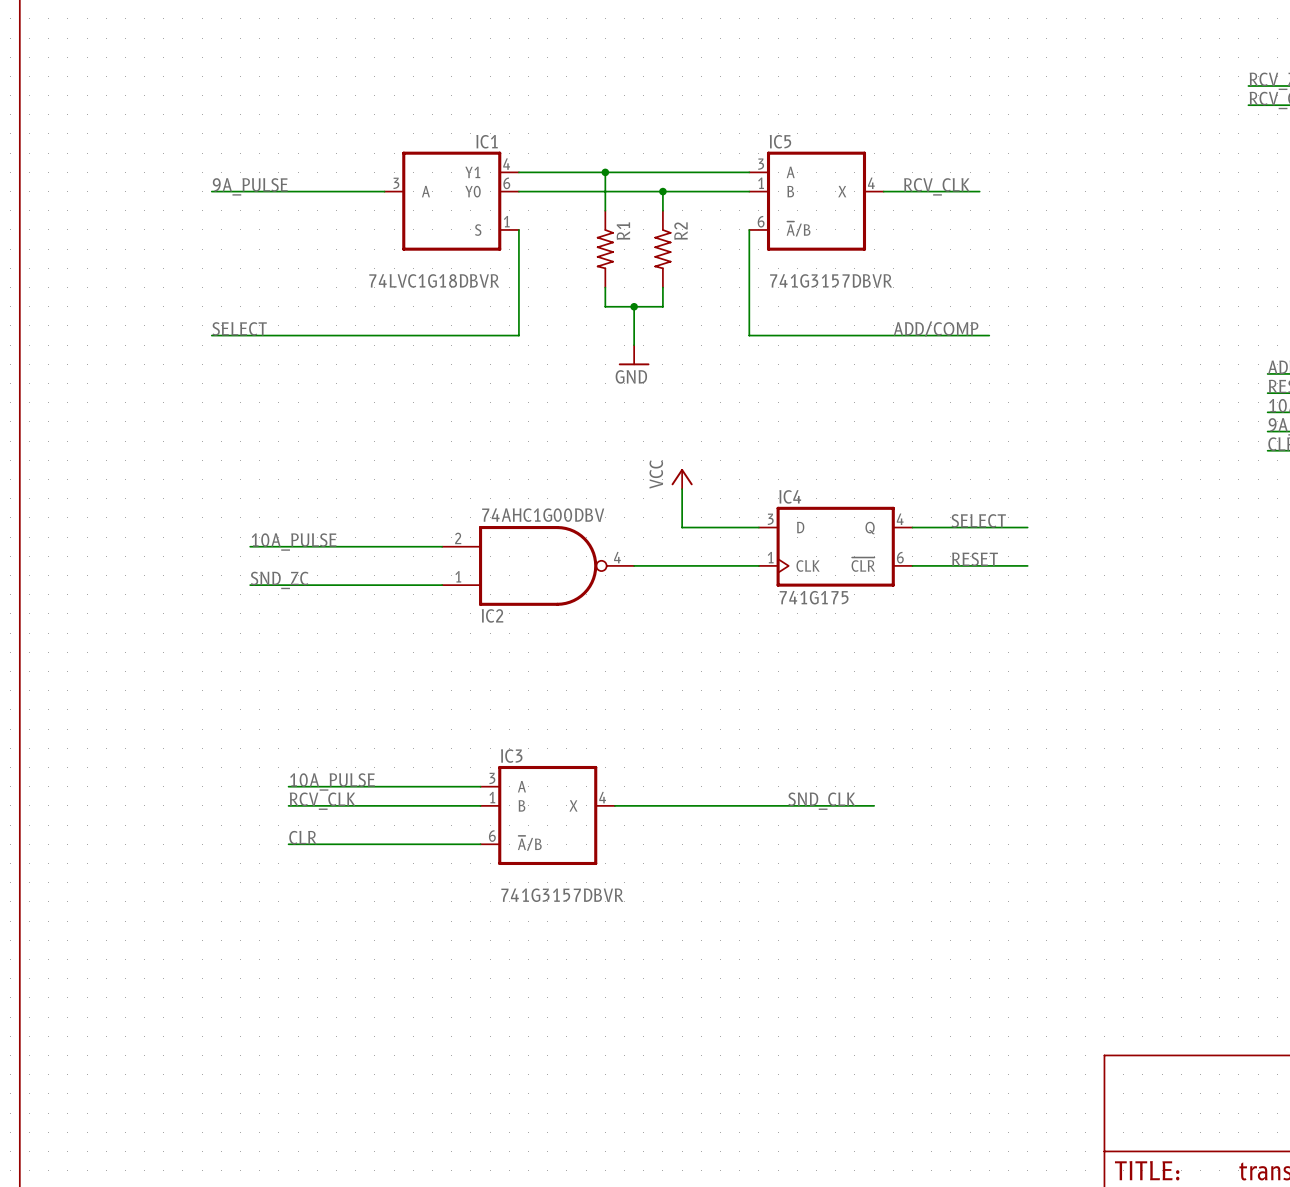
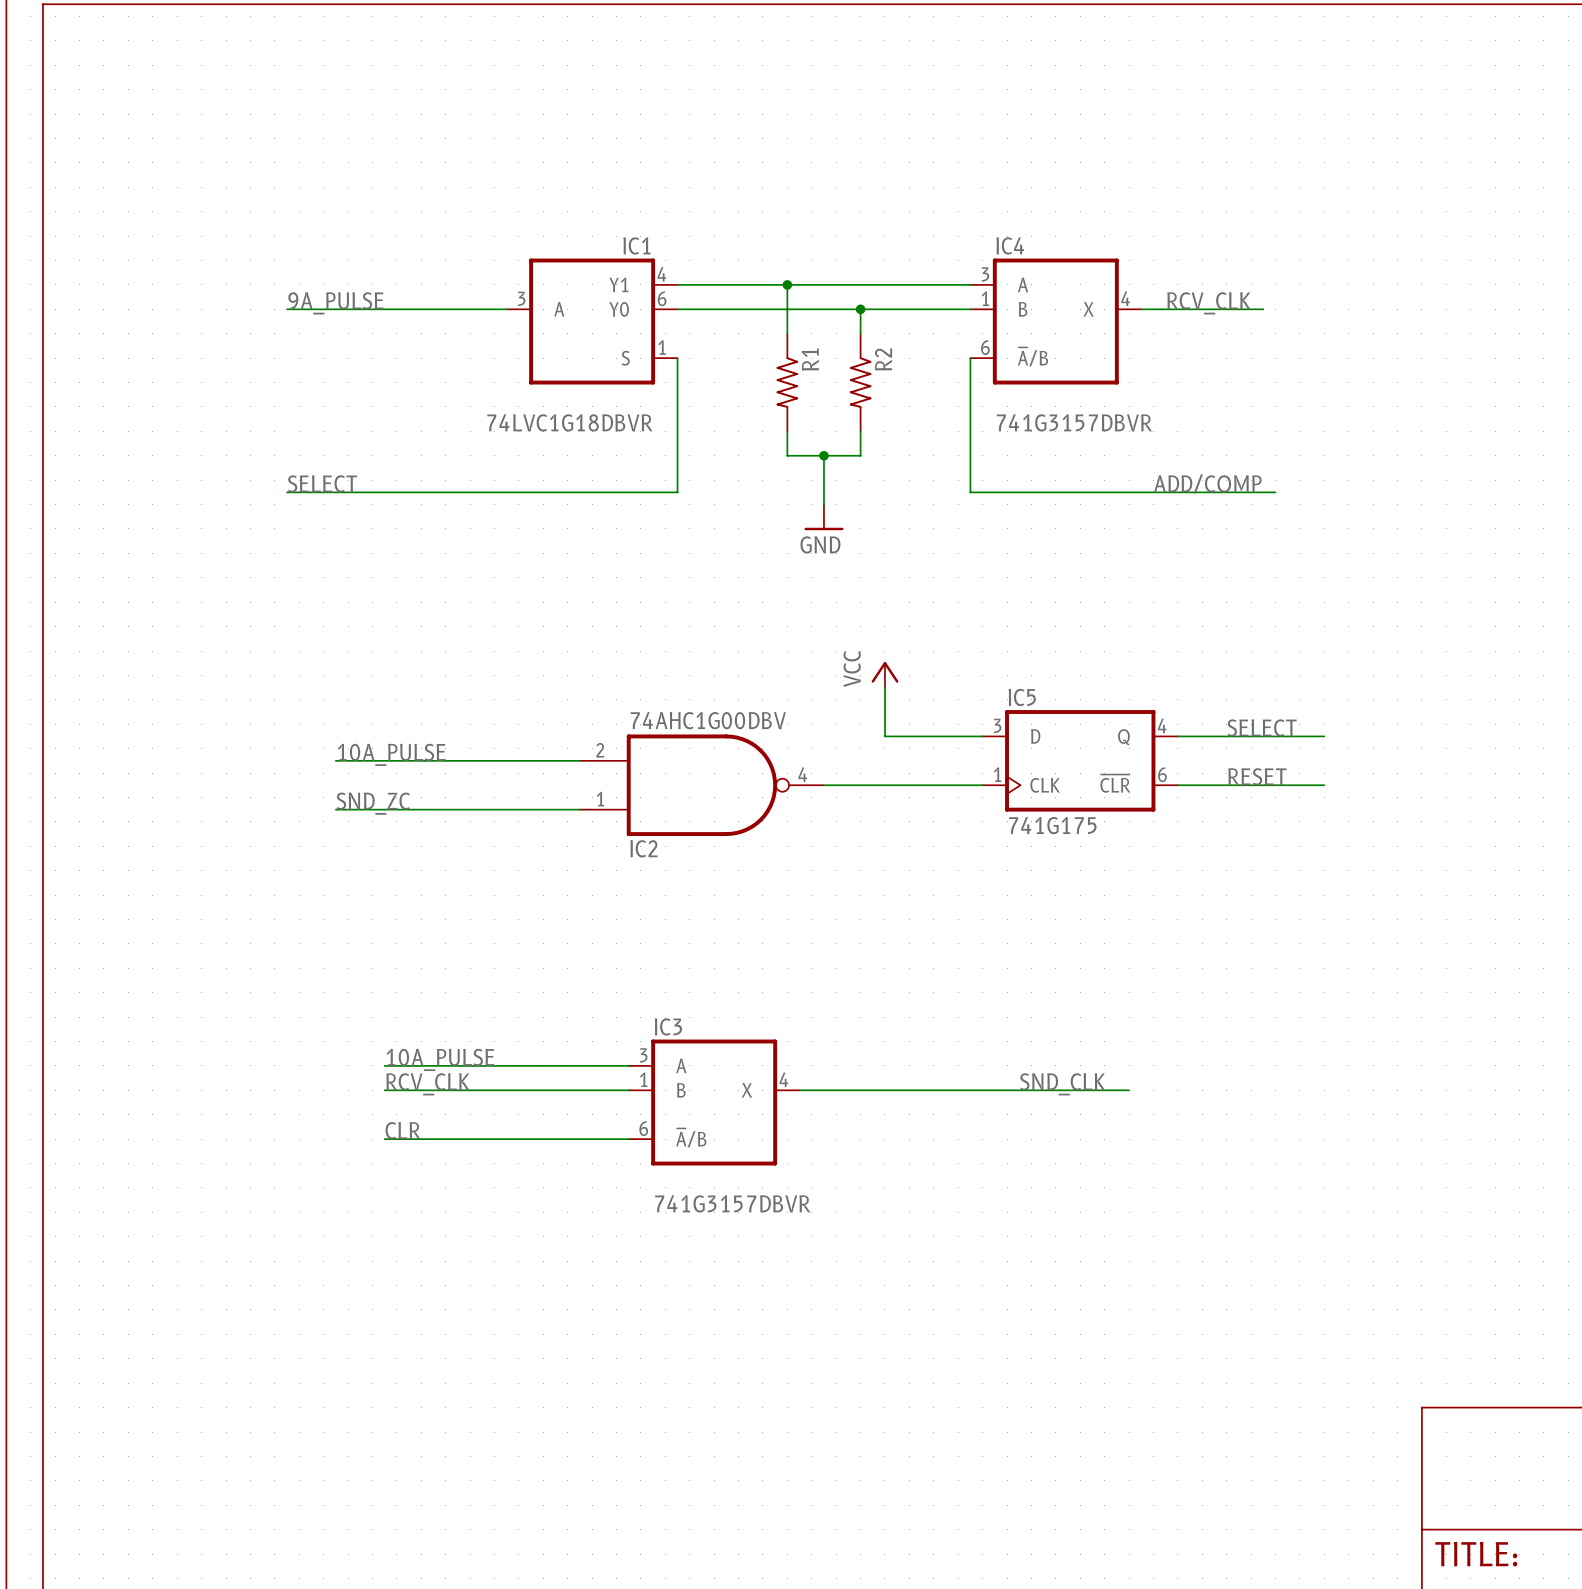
IC5 name: IC5 (780, 141) -> IC4 (1010, 245)
IC4 name: IC4 (790, 496) -> IC5 (1022, 697)

